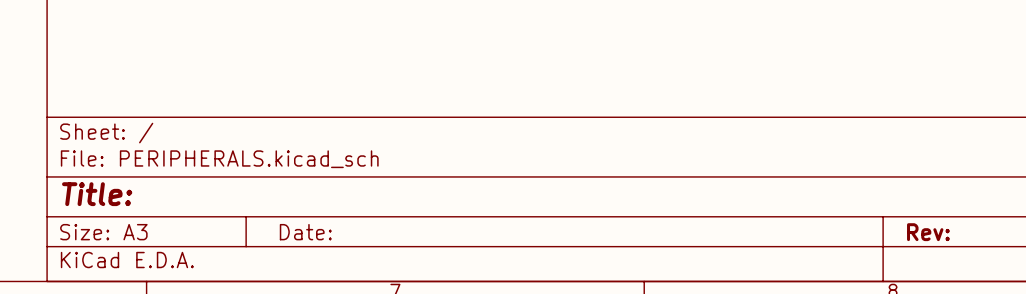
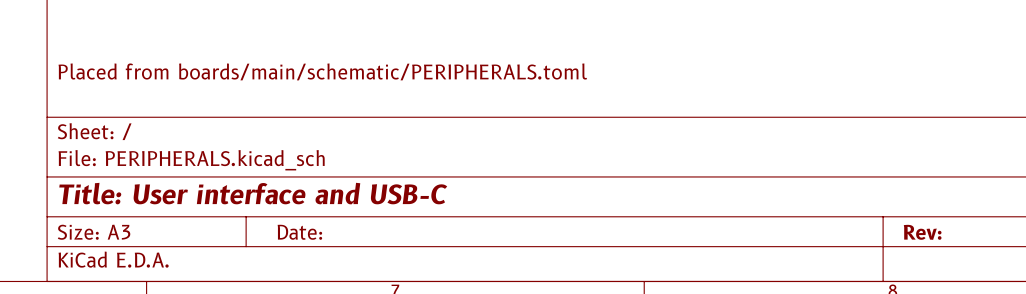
title block: none -> Placed from boards/main/schematic/PERIPHERALS.toml (322, 71)
title block: Title: (97, 194) -> Title: User interface and USB-C (253, 193)

